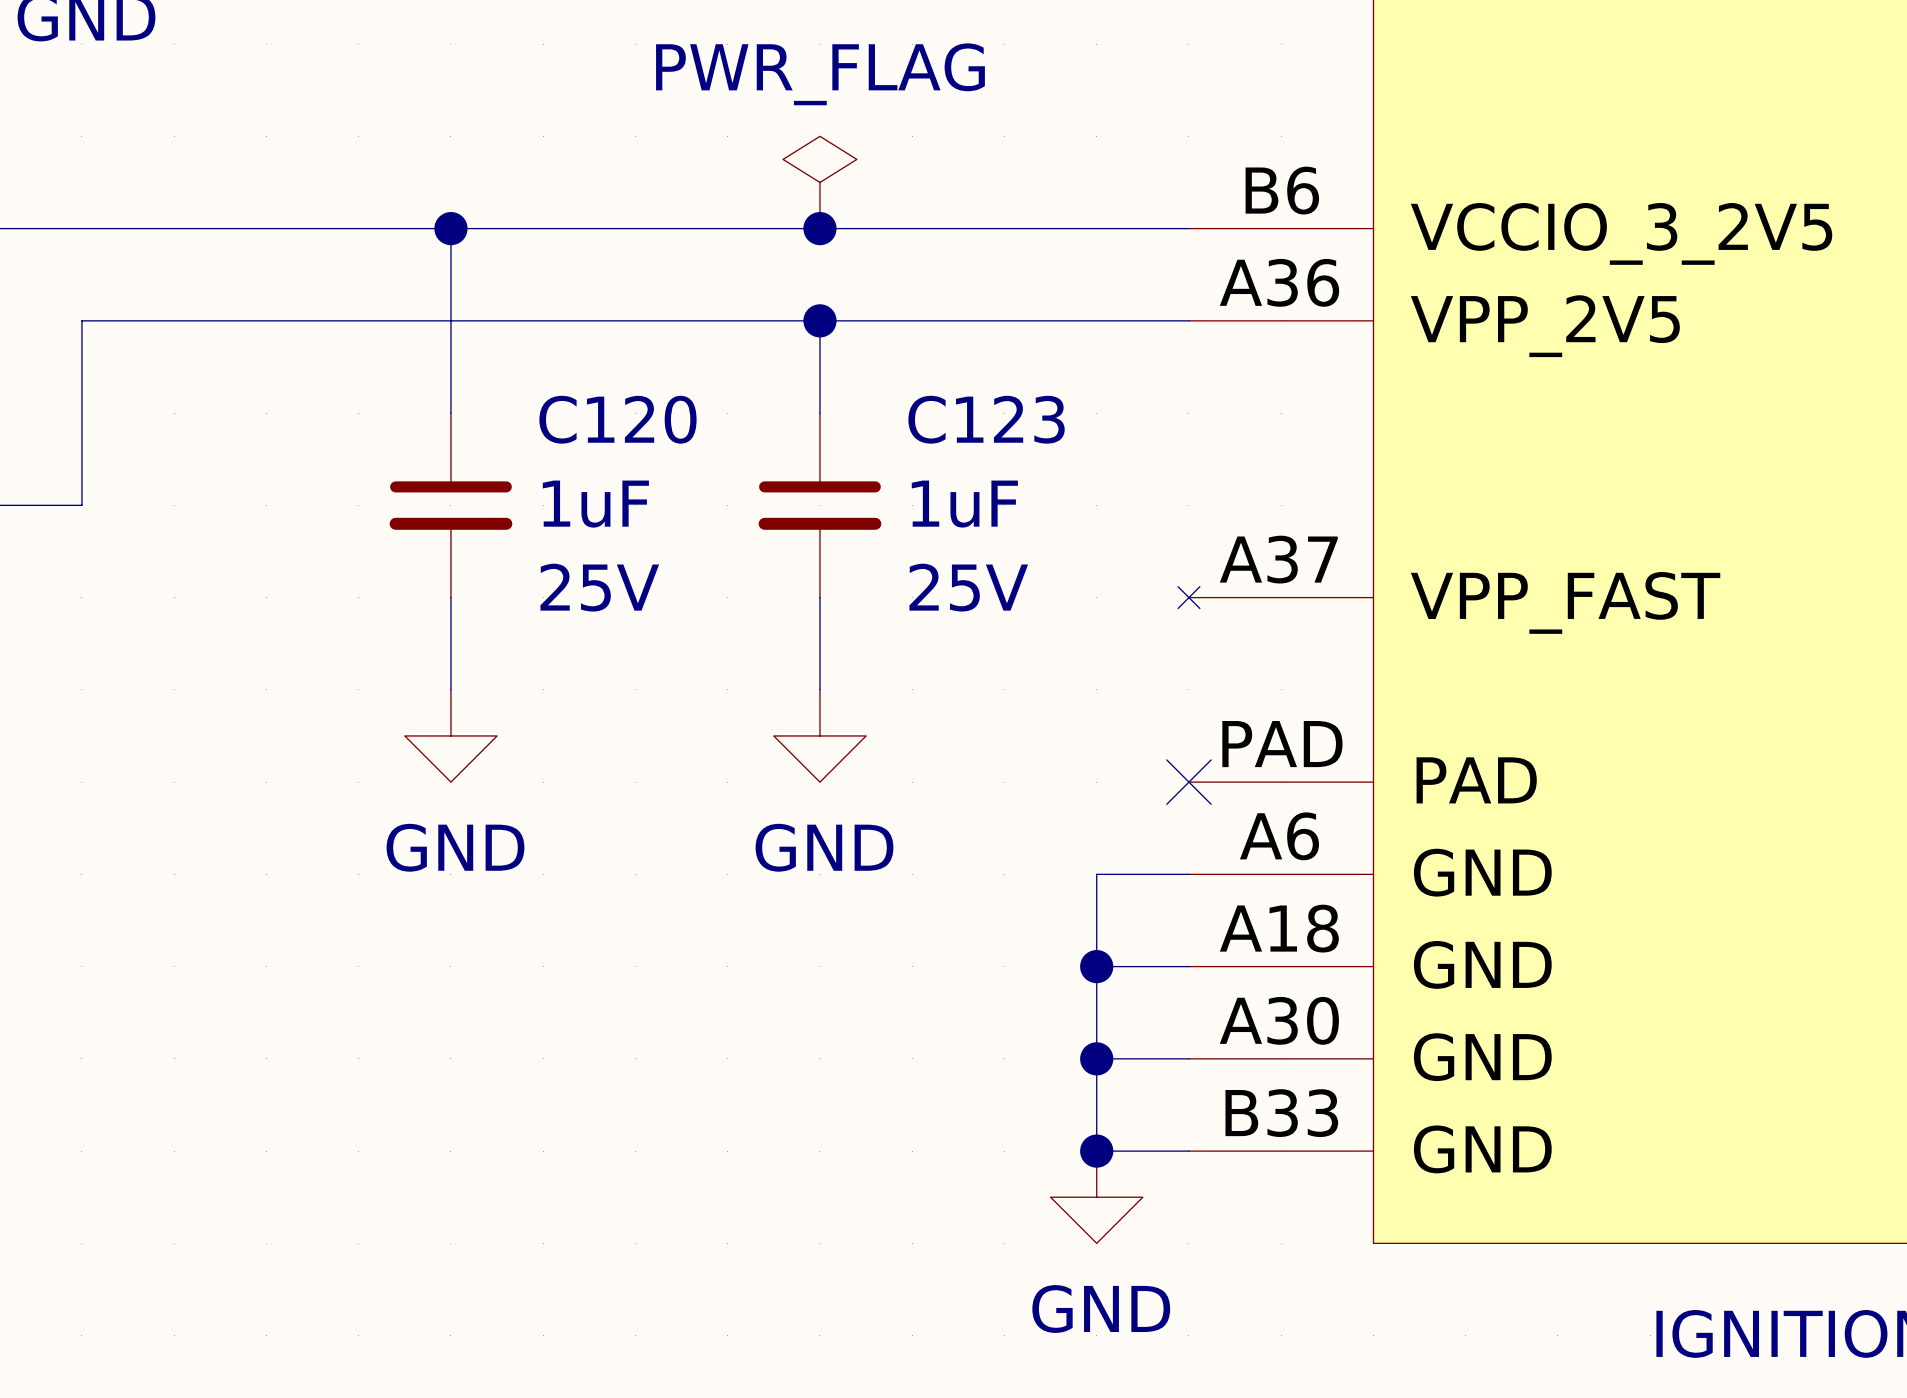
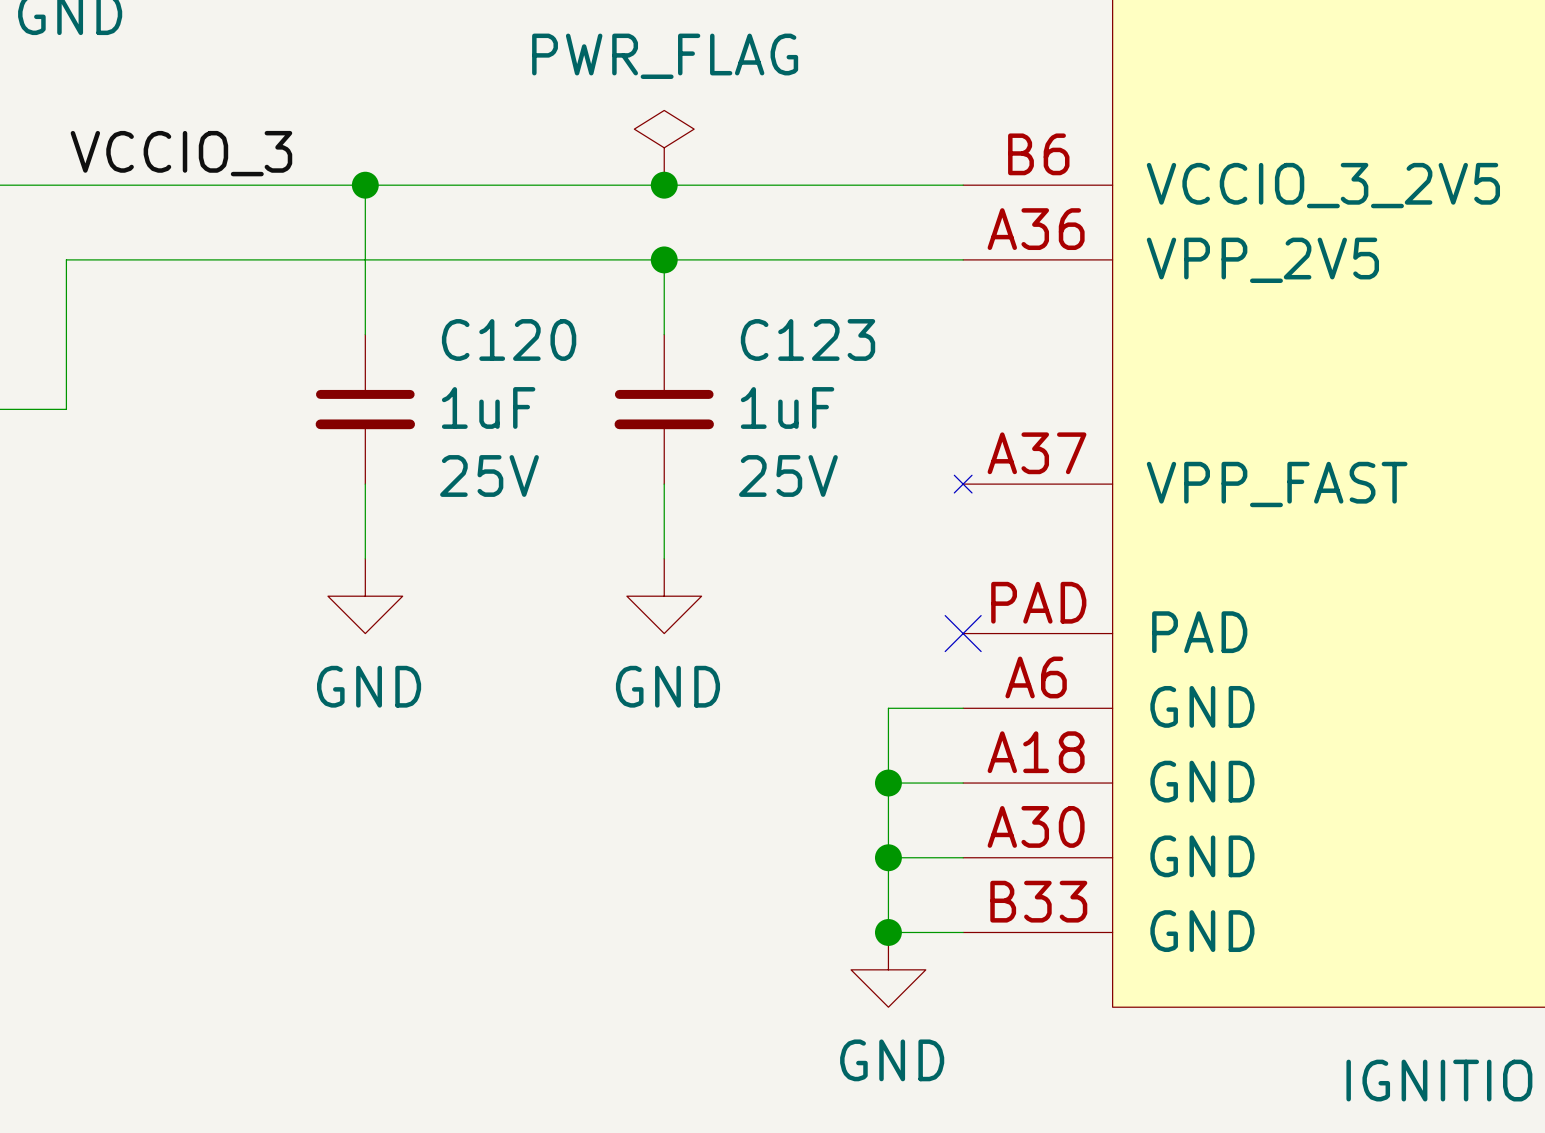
label: none -> VCCIO_3 (181, 153)

